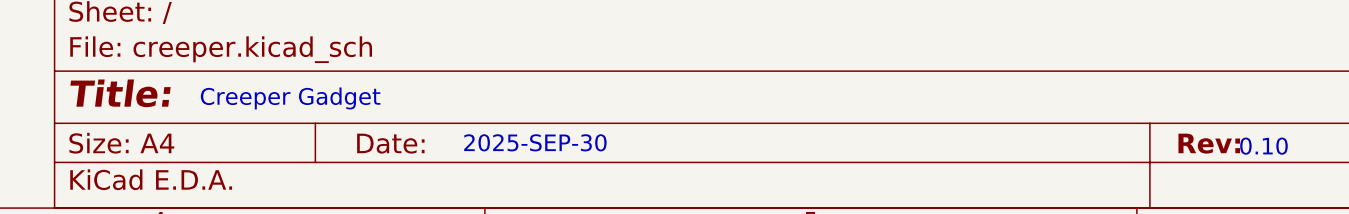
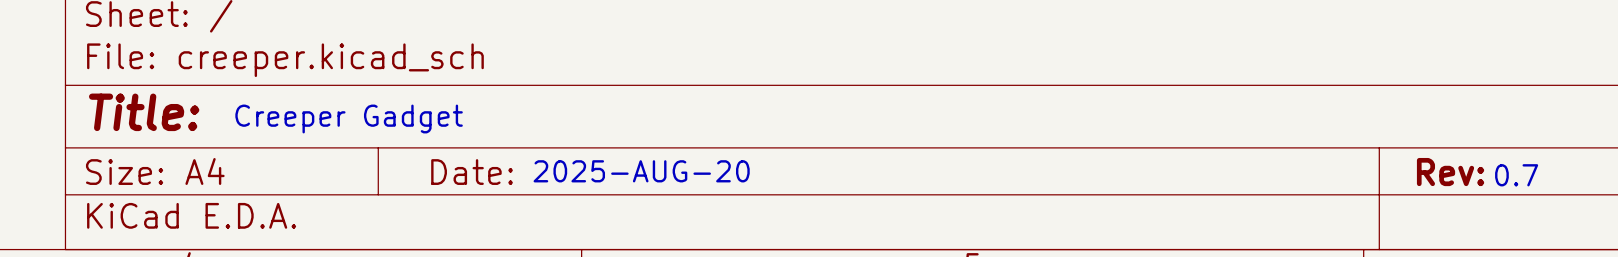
text: 2025-SEP-30 (535, 142) -> 2025-AUG-20 (641, 171)
text: 0.10 (1263, 146) -> 0.7 (1516, 175)

